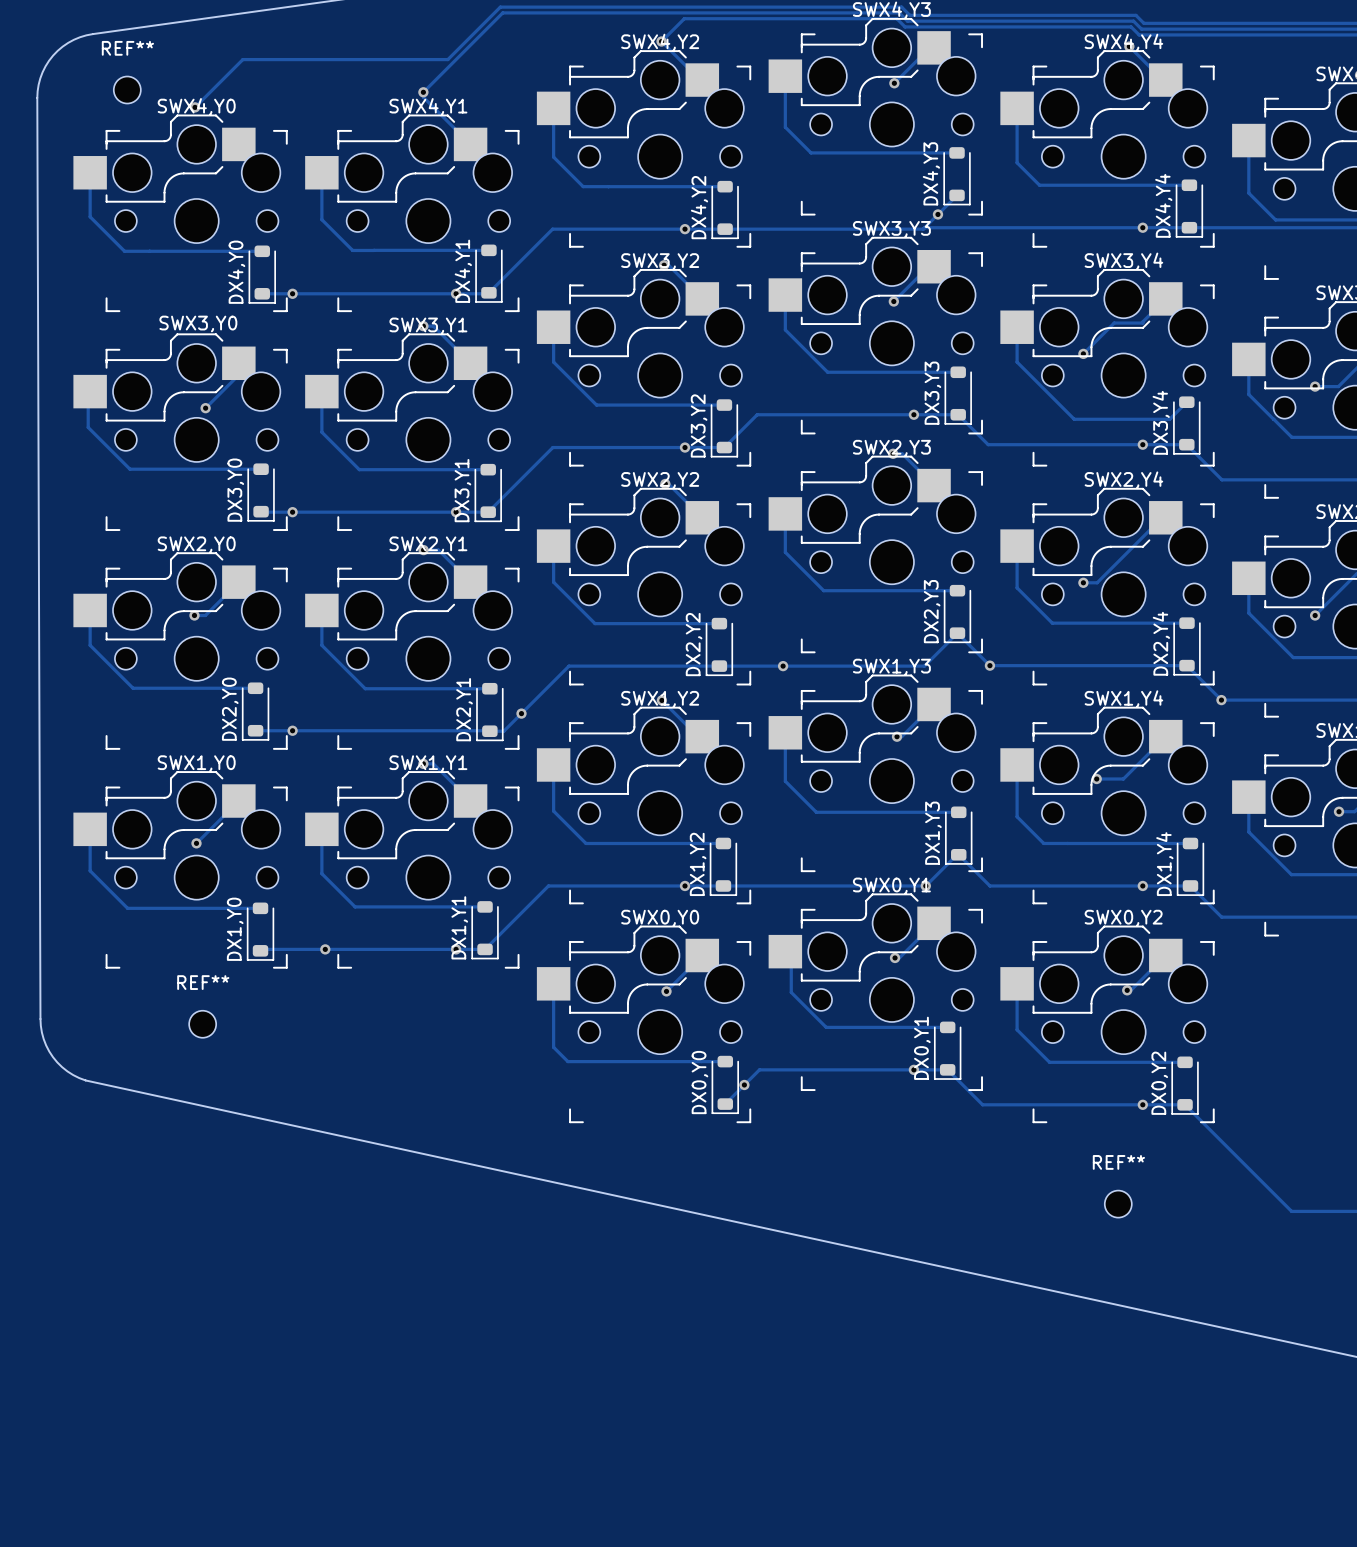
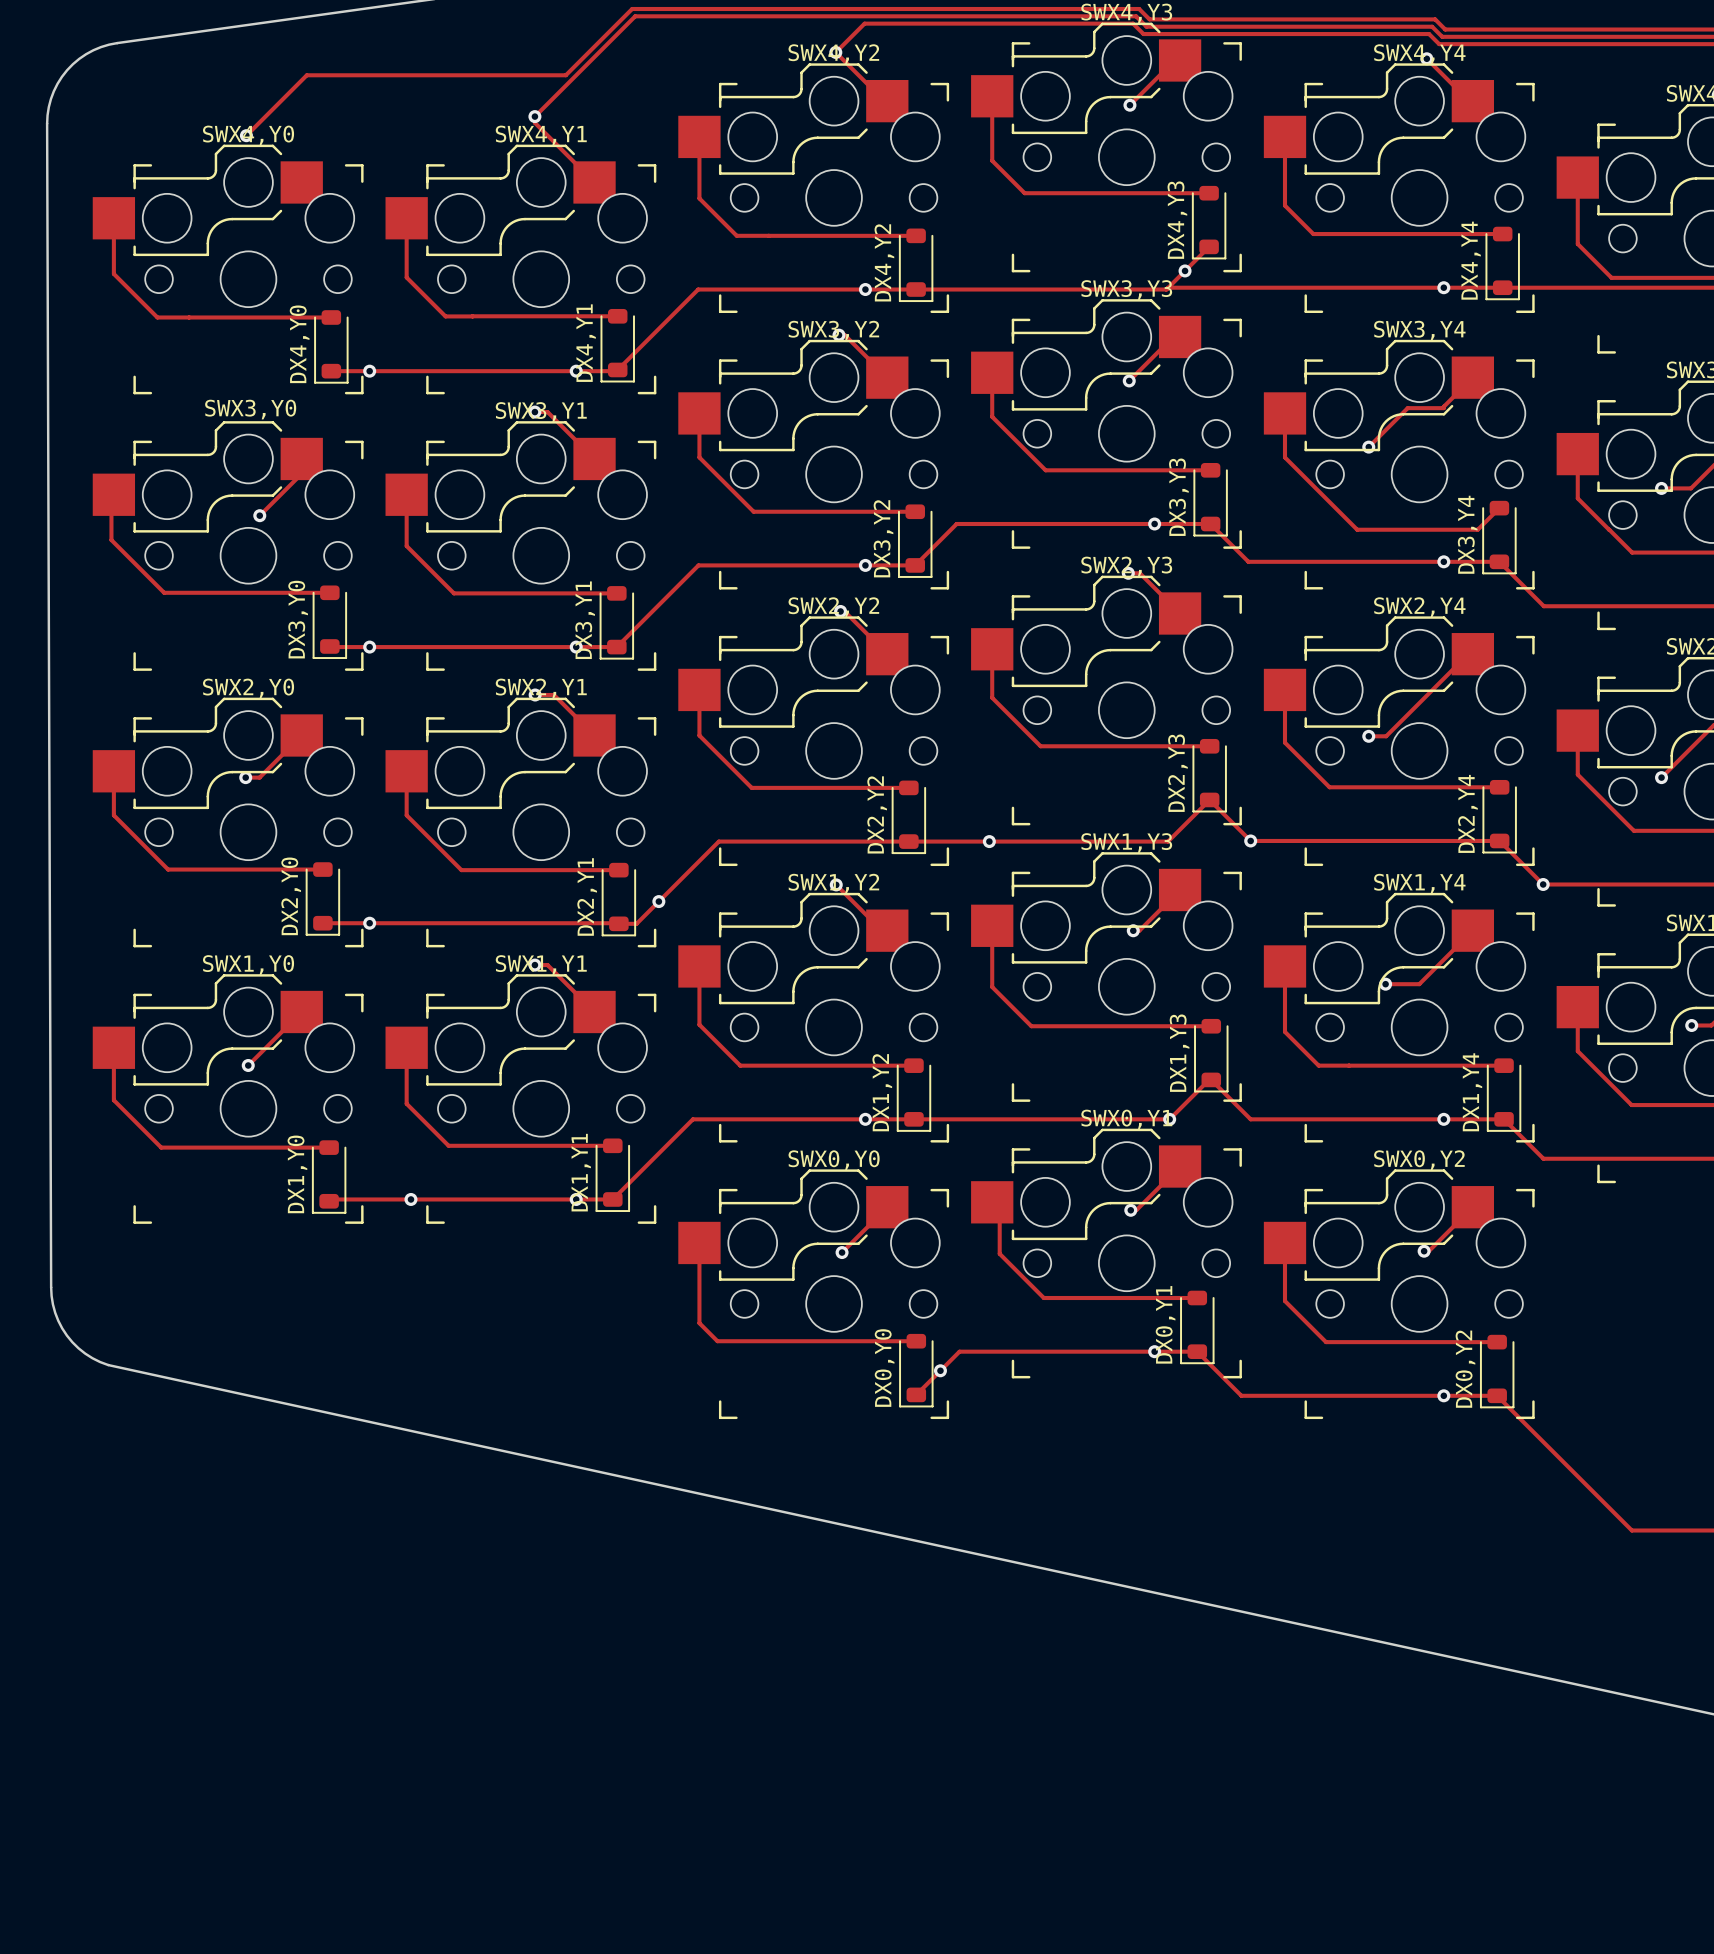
REF**: (127, 90) -> none
REF**: (202, 1024) -> none
REF**: (1118, 1204) -> none

